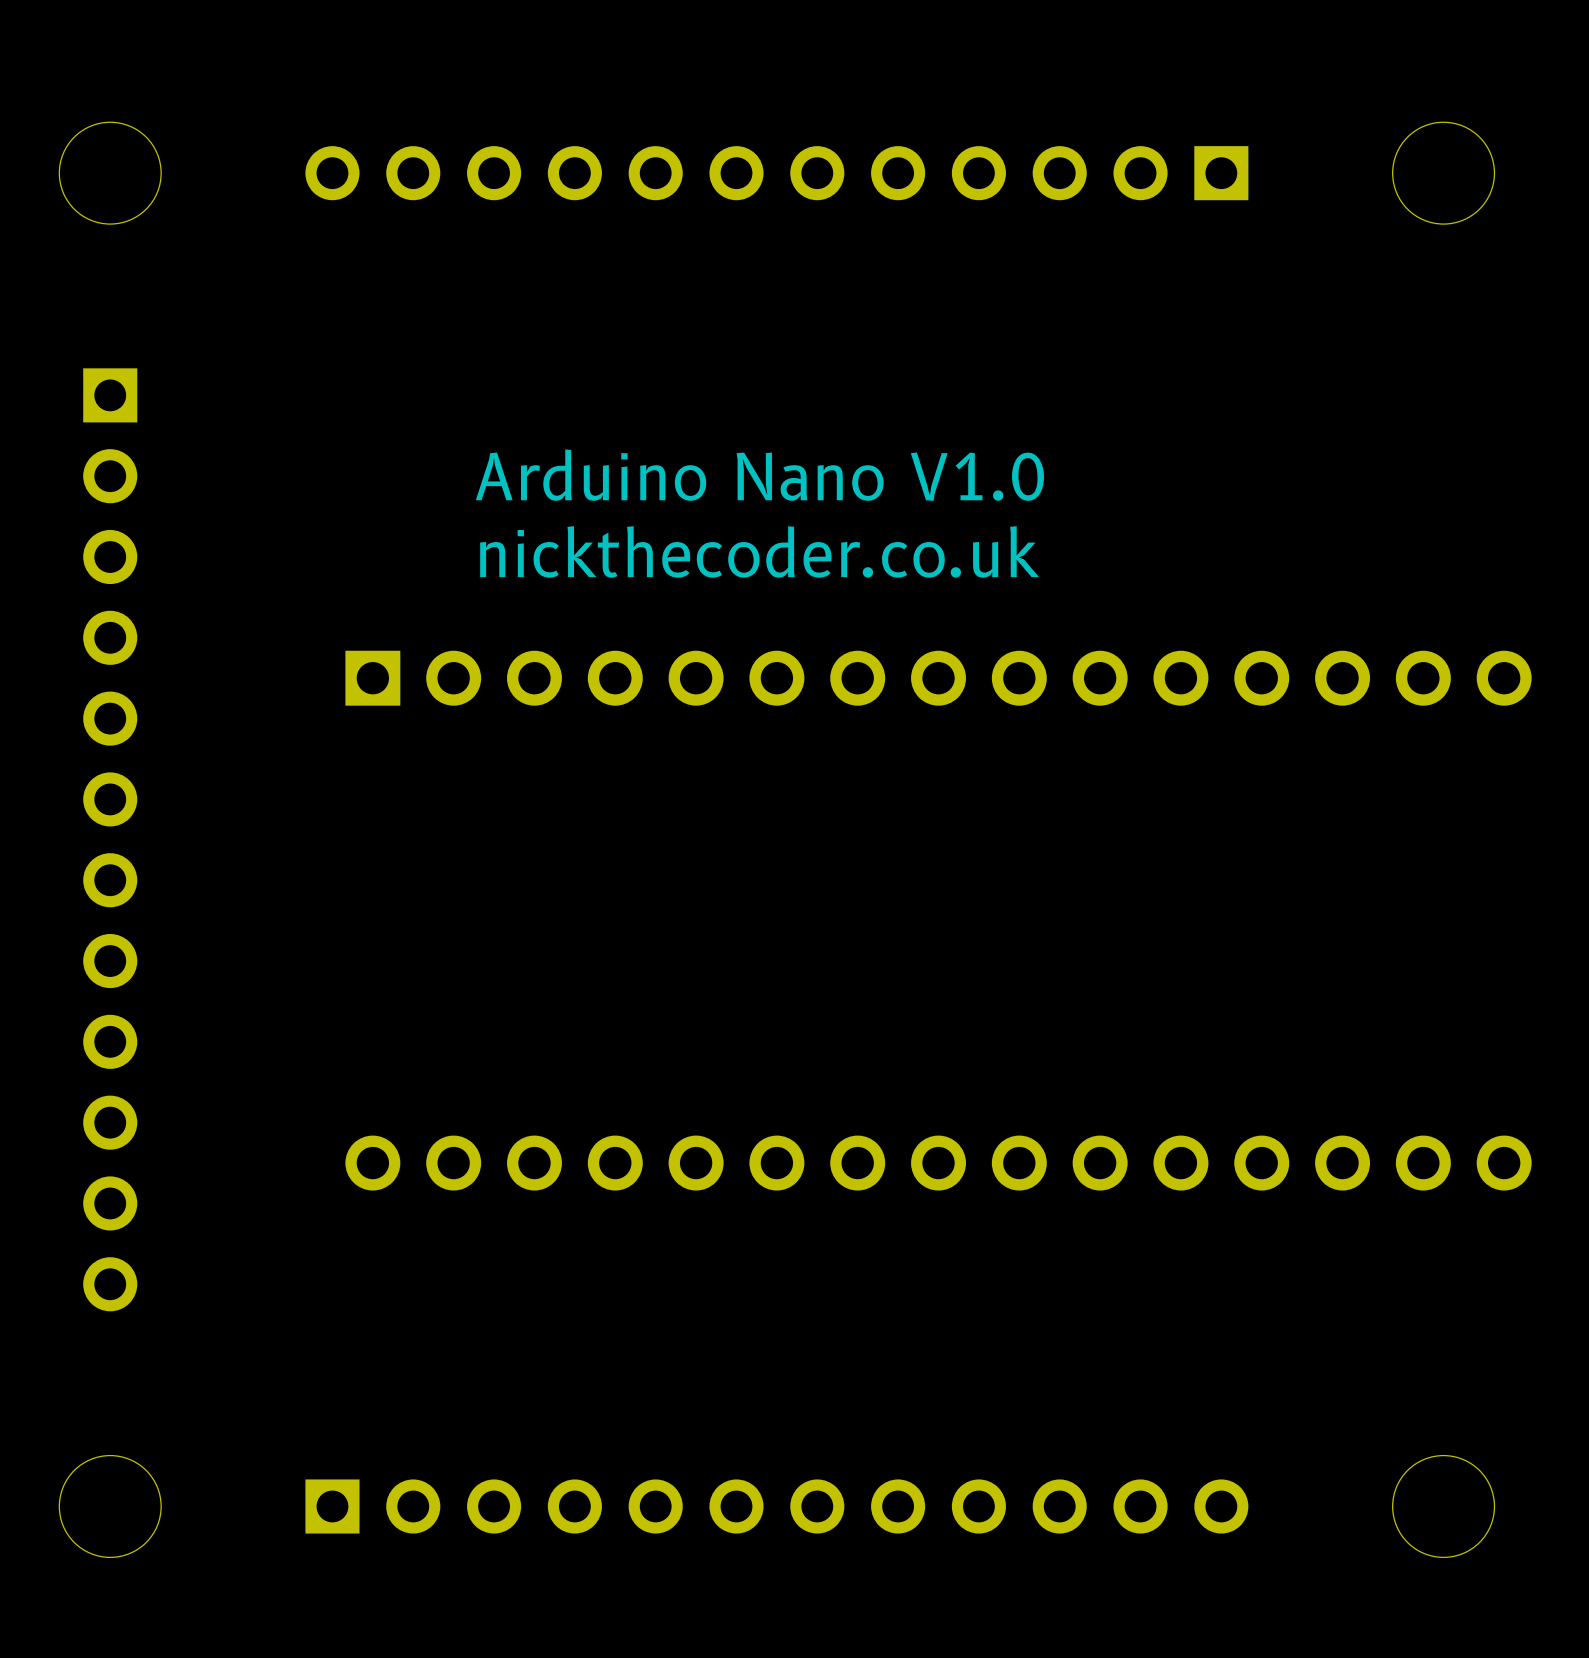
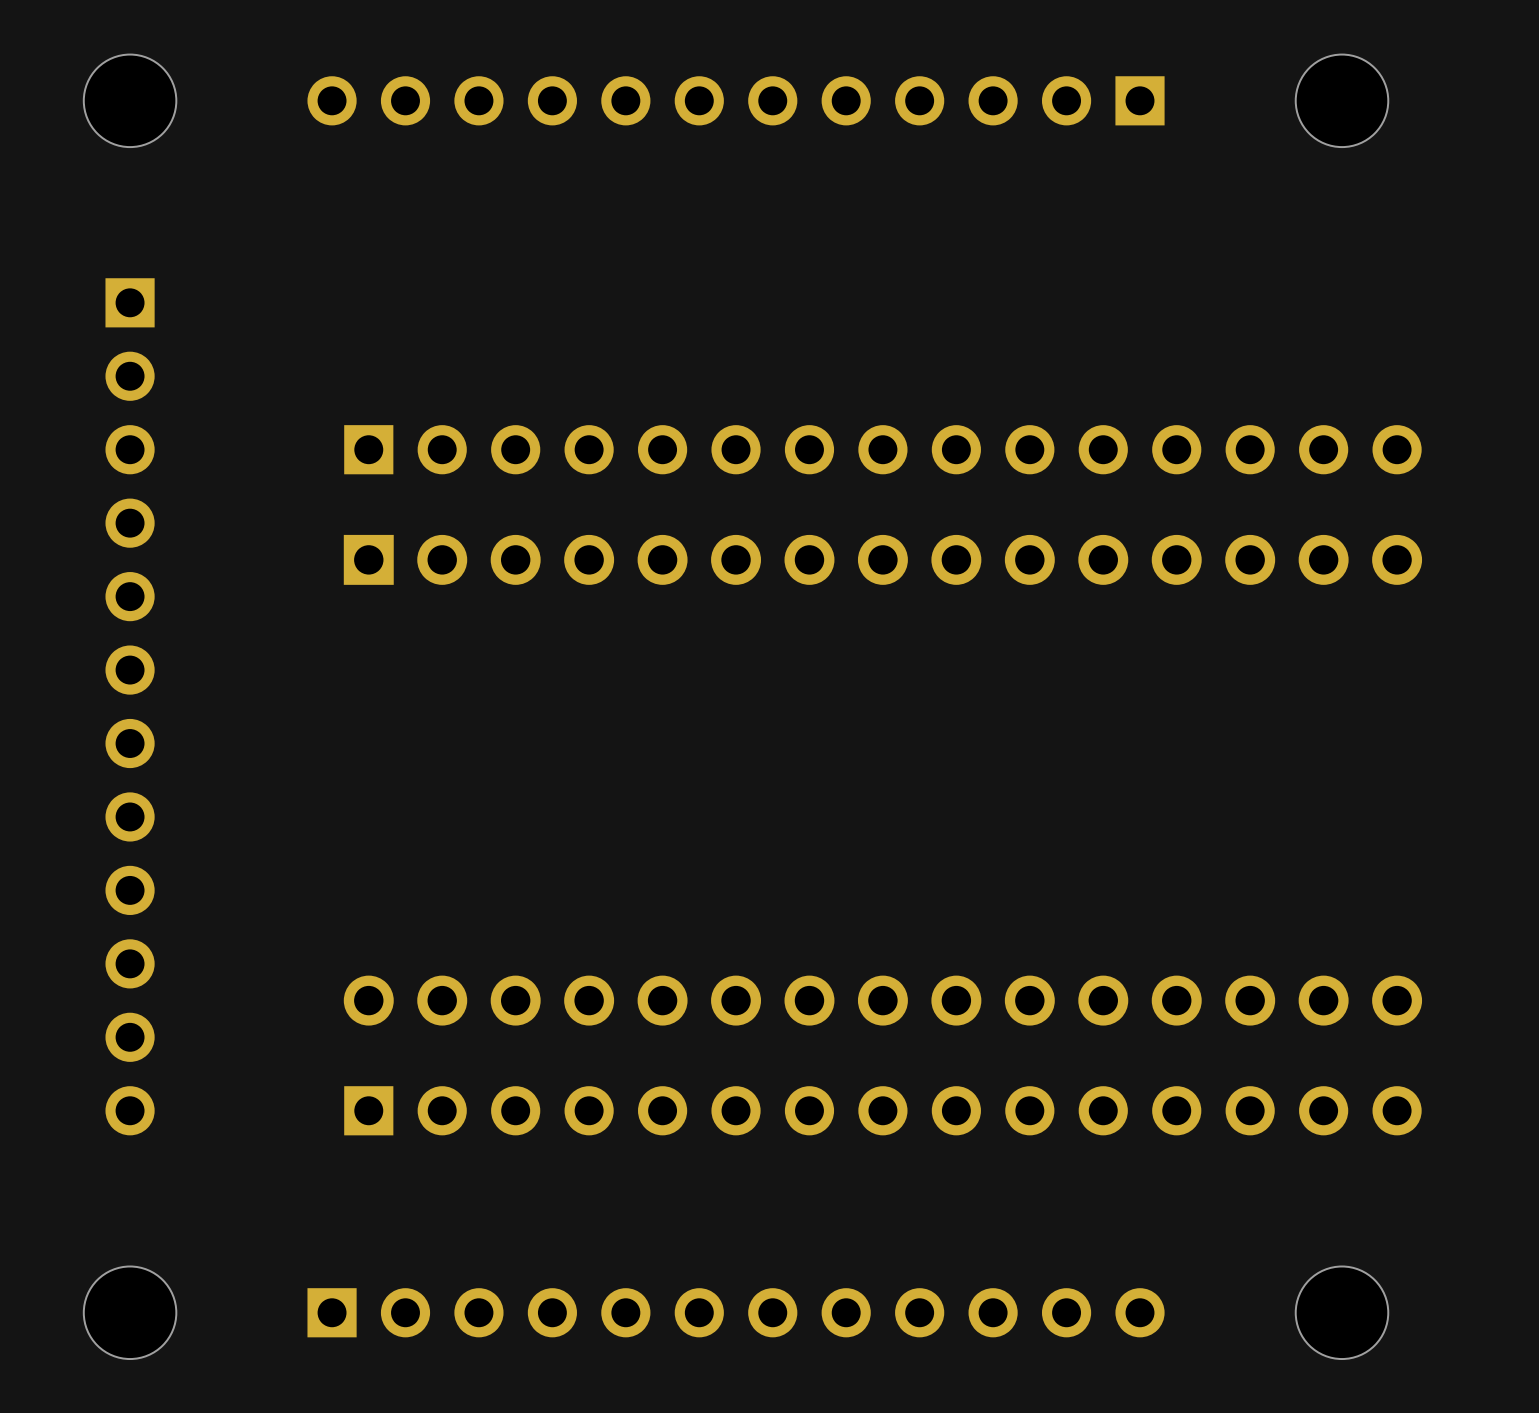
text: Arduino Nano V1.0 (759, 475) -> none
text: nickthecoder.co.uk (759, 551) -> none
part: none -> (882, 449)
part: none -> (882, 1110)

